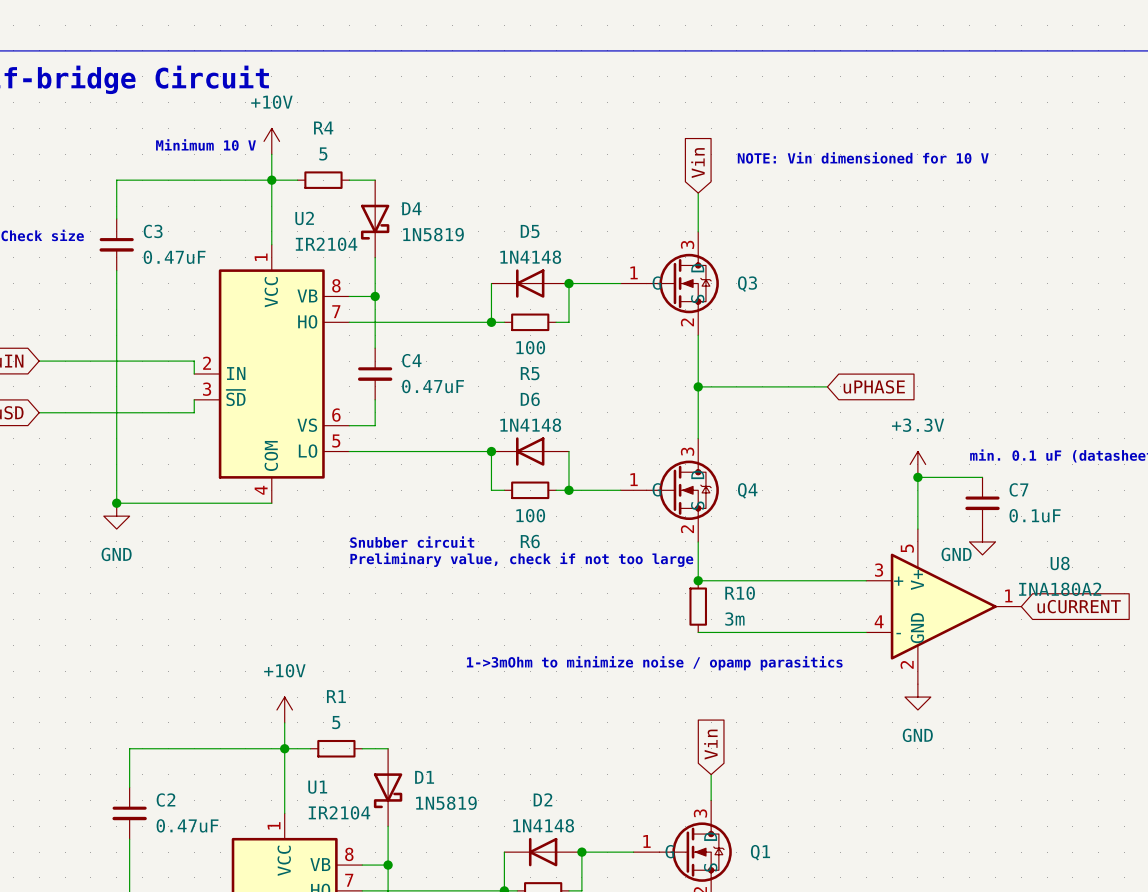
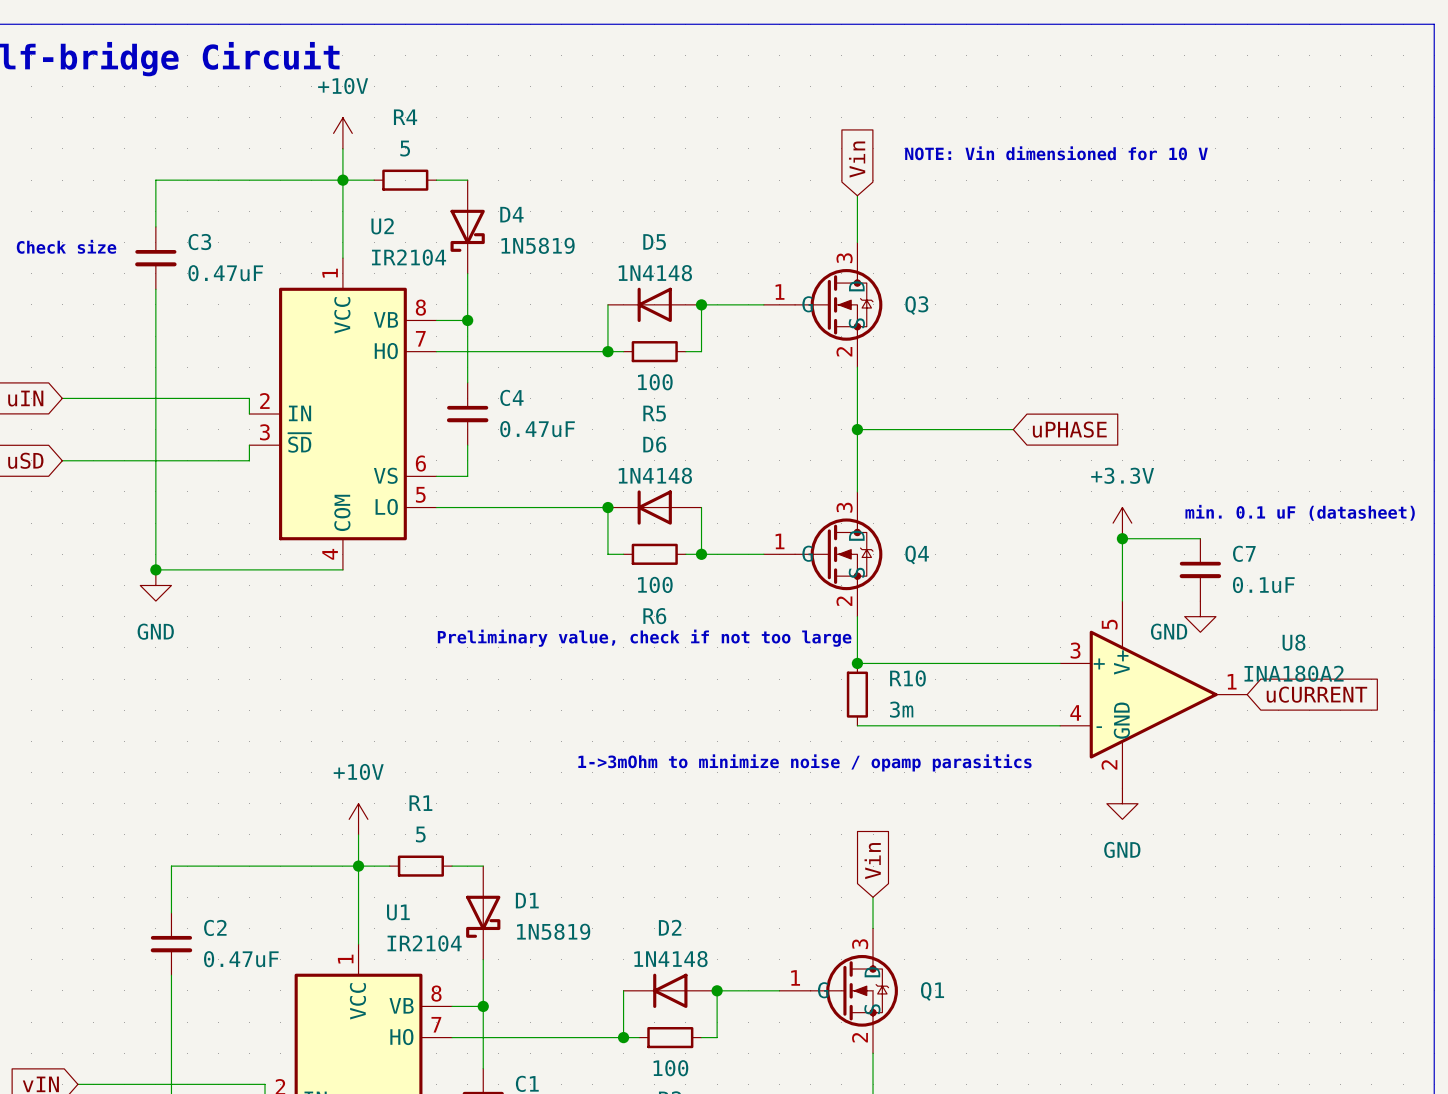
text: Minimum 10 V (205, 144) -> none
text: Snubber circuit (412, 542) -> none

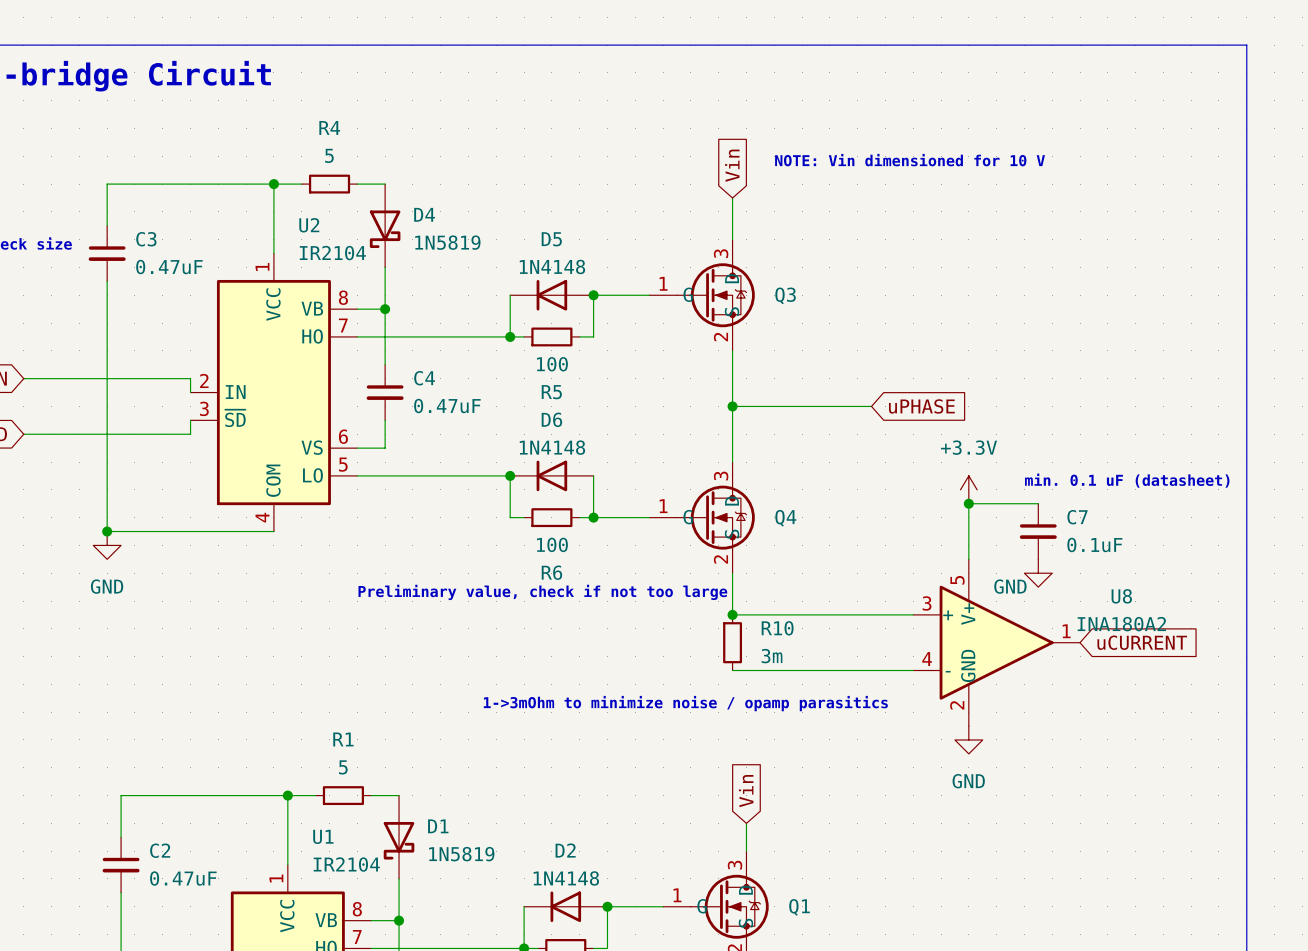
power symbol: +10V (342, 133) -> none
wire: (342, 148) (342, 180) -> none
power symbol: +10V (358, 819) -> none
wire: (358, 834) (358, 866) -> none

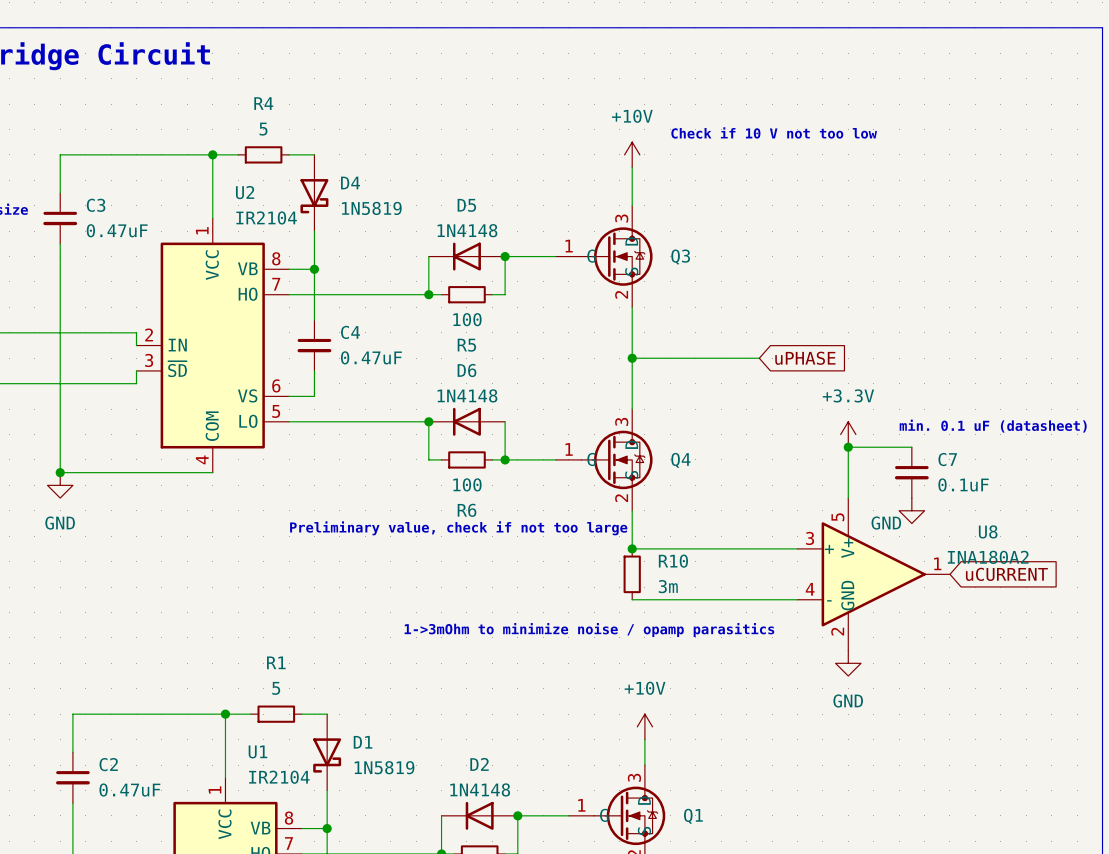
text: NOTE: Vin dimensioned for 10 V (910, 160) -> Check if 10 V not too low (774, 132)
global label: Vin (732, 165) -> none
power symbol: none -> +10V (632, 154)
global label: Vin (746, 791) -> none
power symbol: none -> +10V (644, 726)

